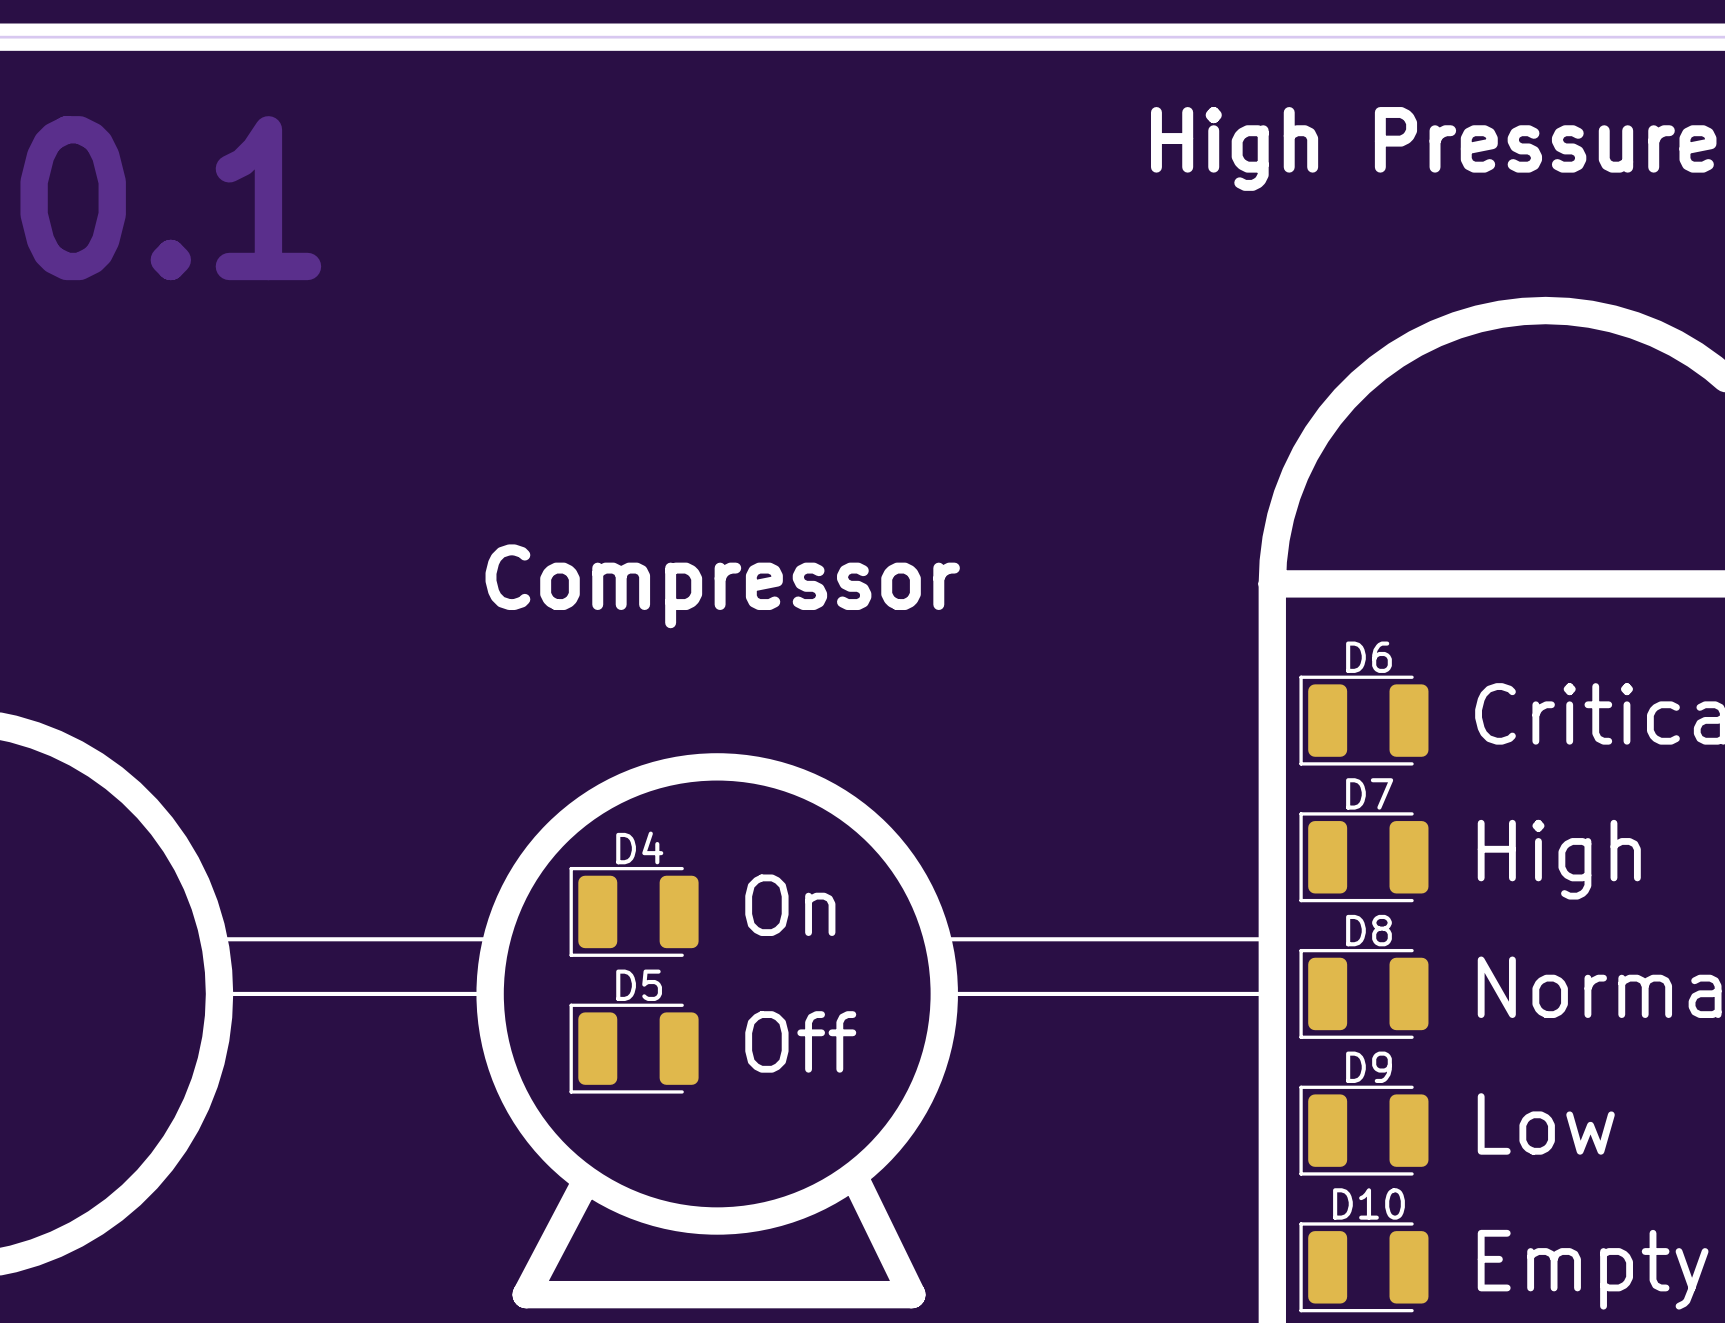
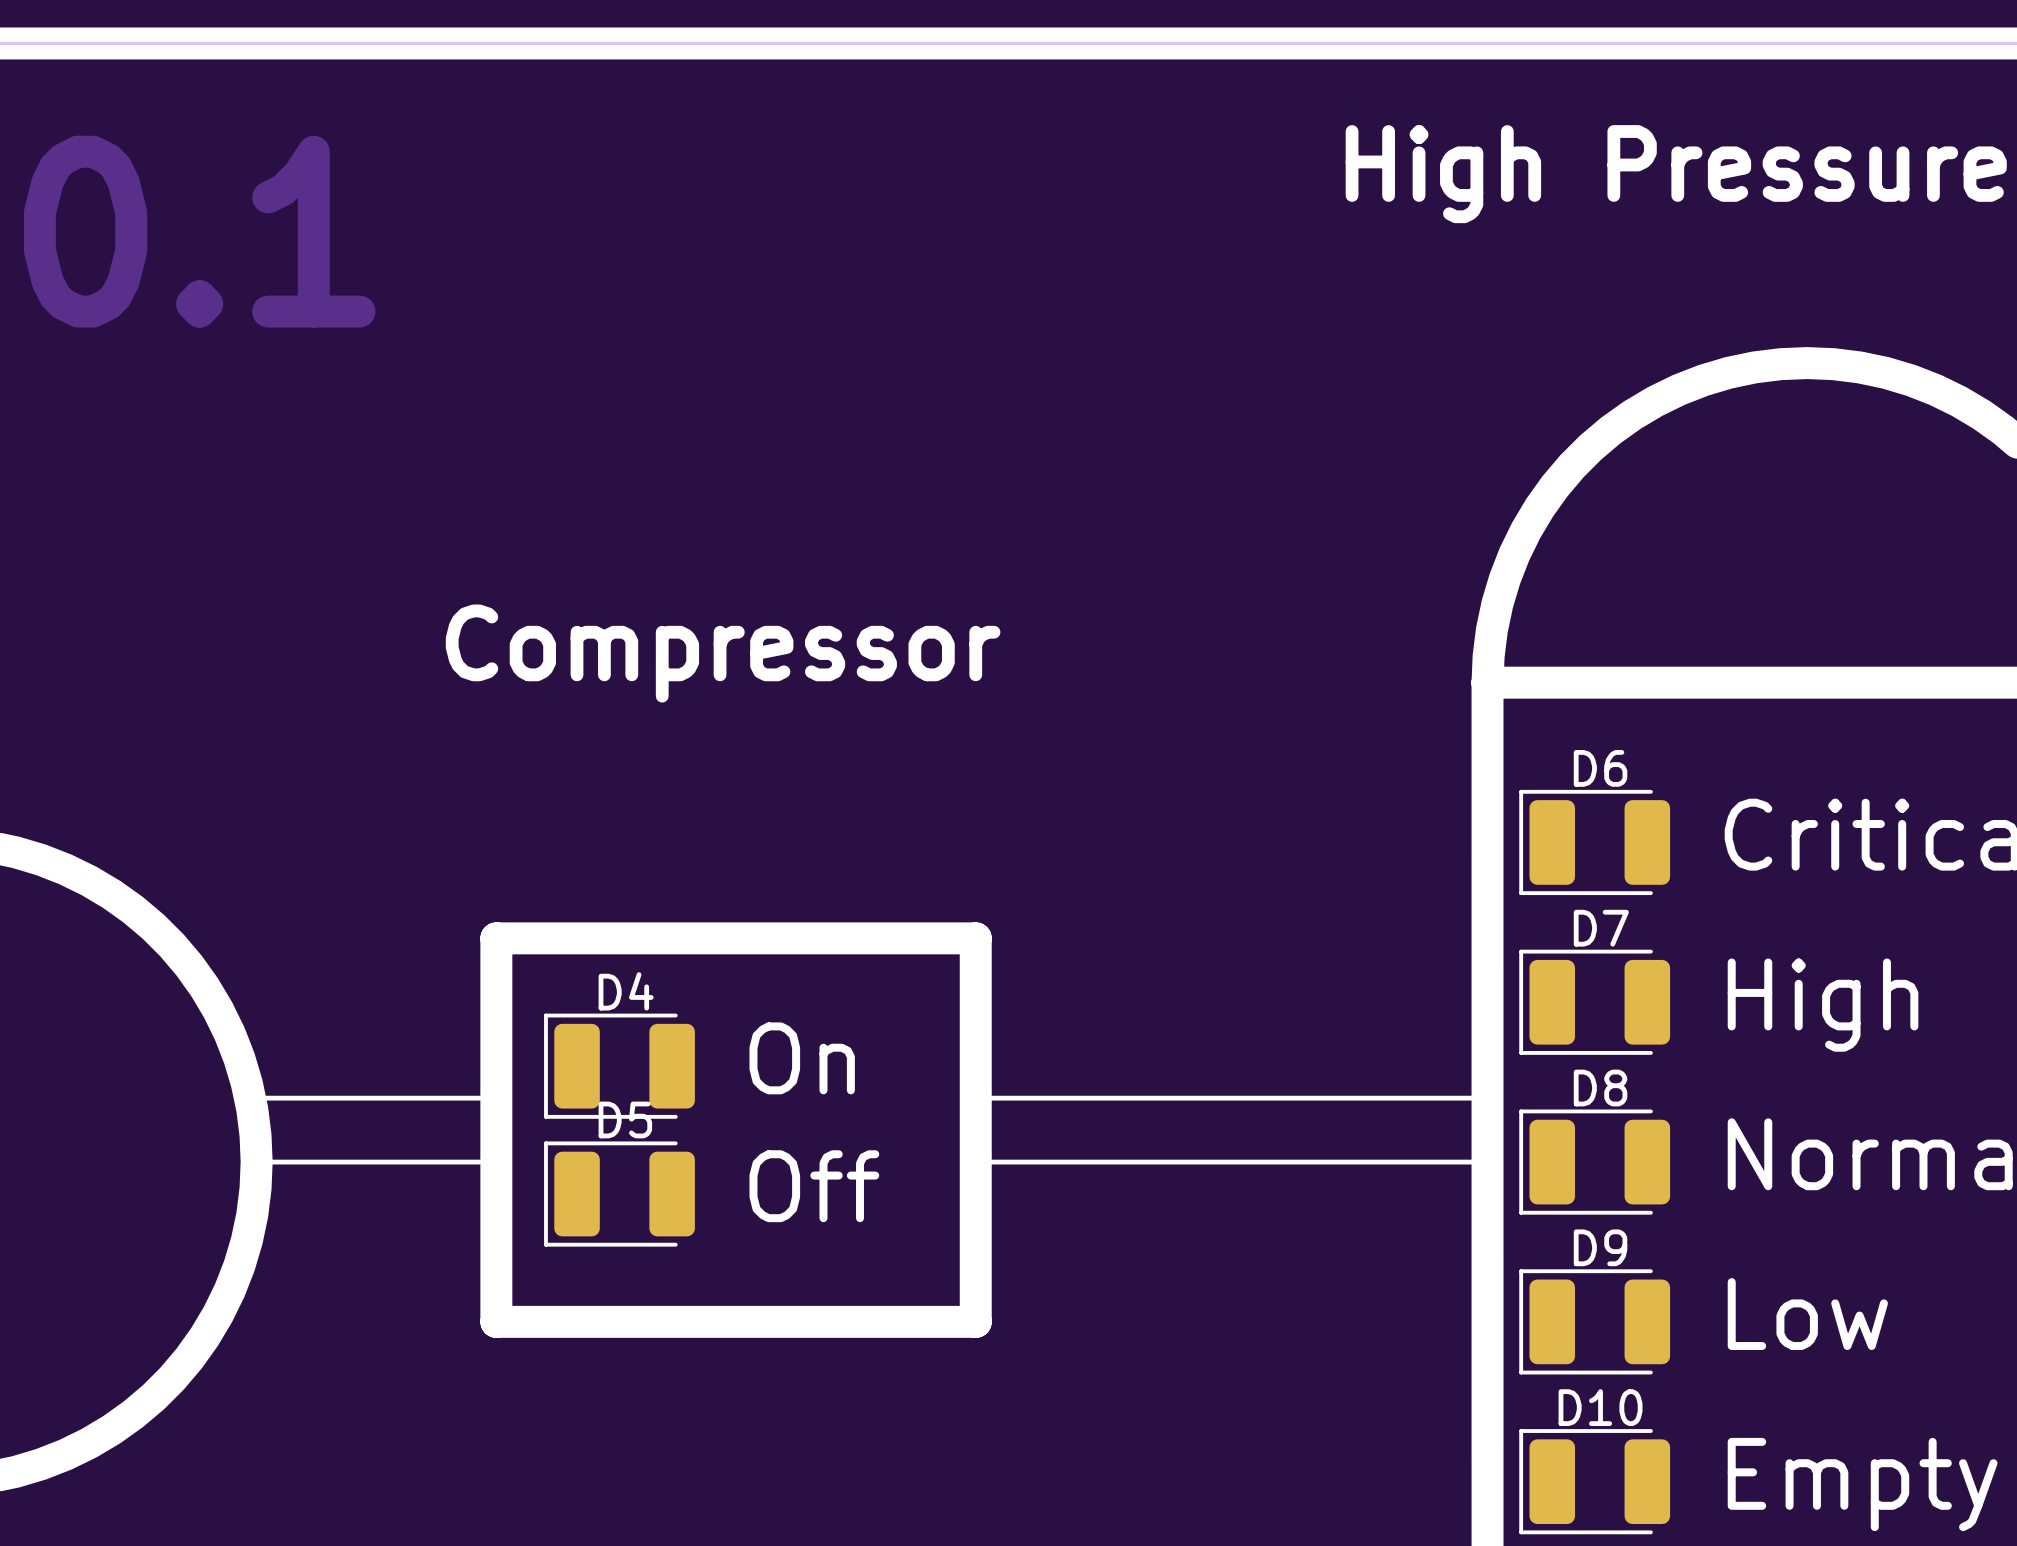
text position: Compressor (722, 586) -> Compressor (723, 653)
drawing: [476, 753, 958, 1235] -> none
line: none -> (496, 938) (975, 938) (975, 1321) (496, 1321) (496, 938)
text position: On (790, 905) -> On (802, 1058)
D4 position: (634, 911) -> (619, 1066)
line: (424, 939) (506, 939) -> none
line: none -> (988, 1098) (1104, 1098)
line: (414, 993) (490, 993) -> none
line: none -> (982, 1162) (1104, 1162)
text position: Off (800, 1041) -> Off (814, 1186)
D5 position: (634, 1048) -> (619, 1194)
line: (583, 1185) (526, 1294) (911, 1294) (858, 1185) -> none

